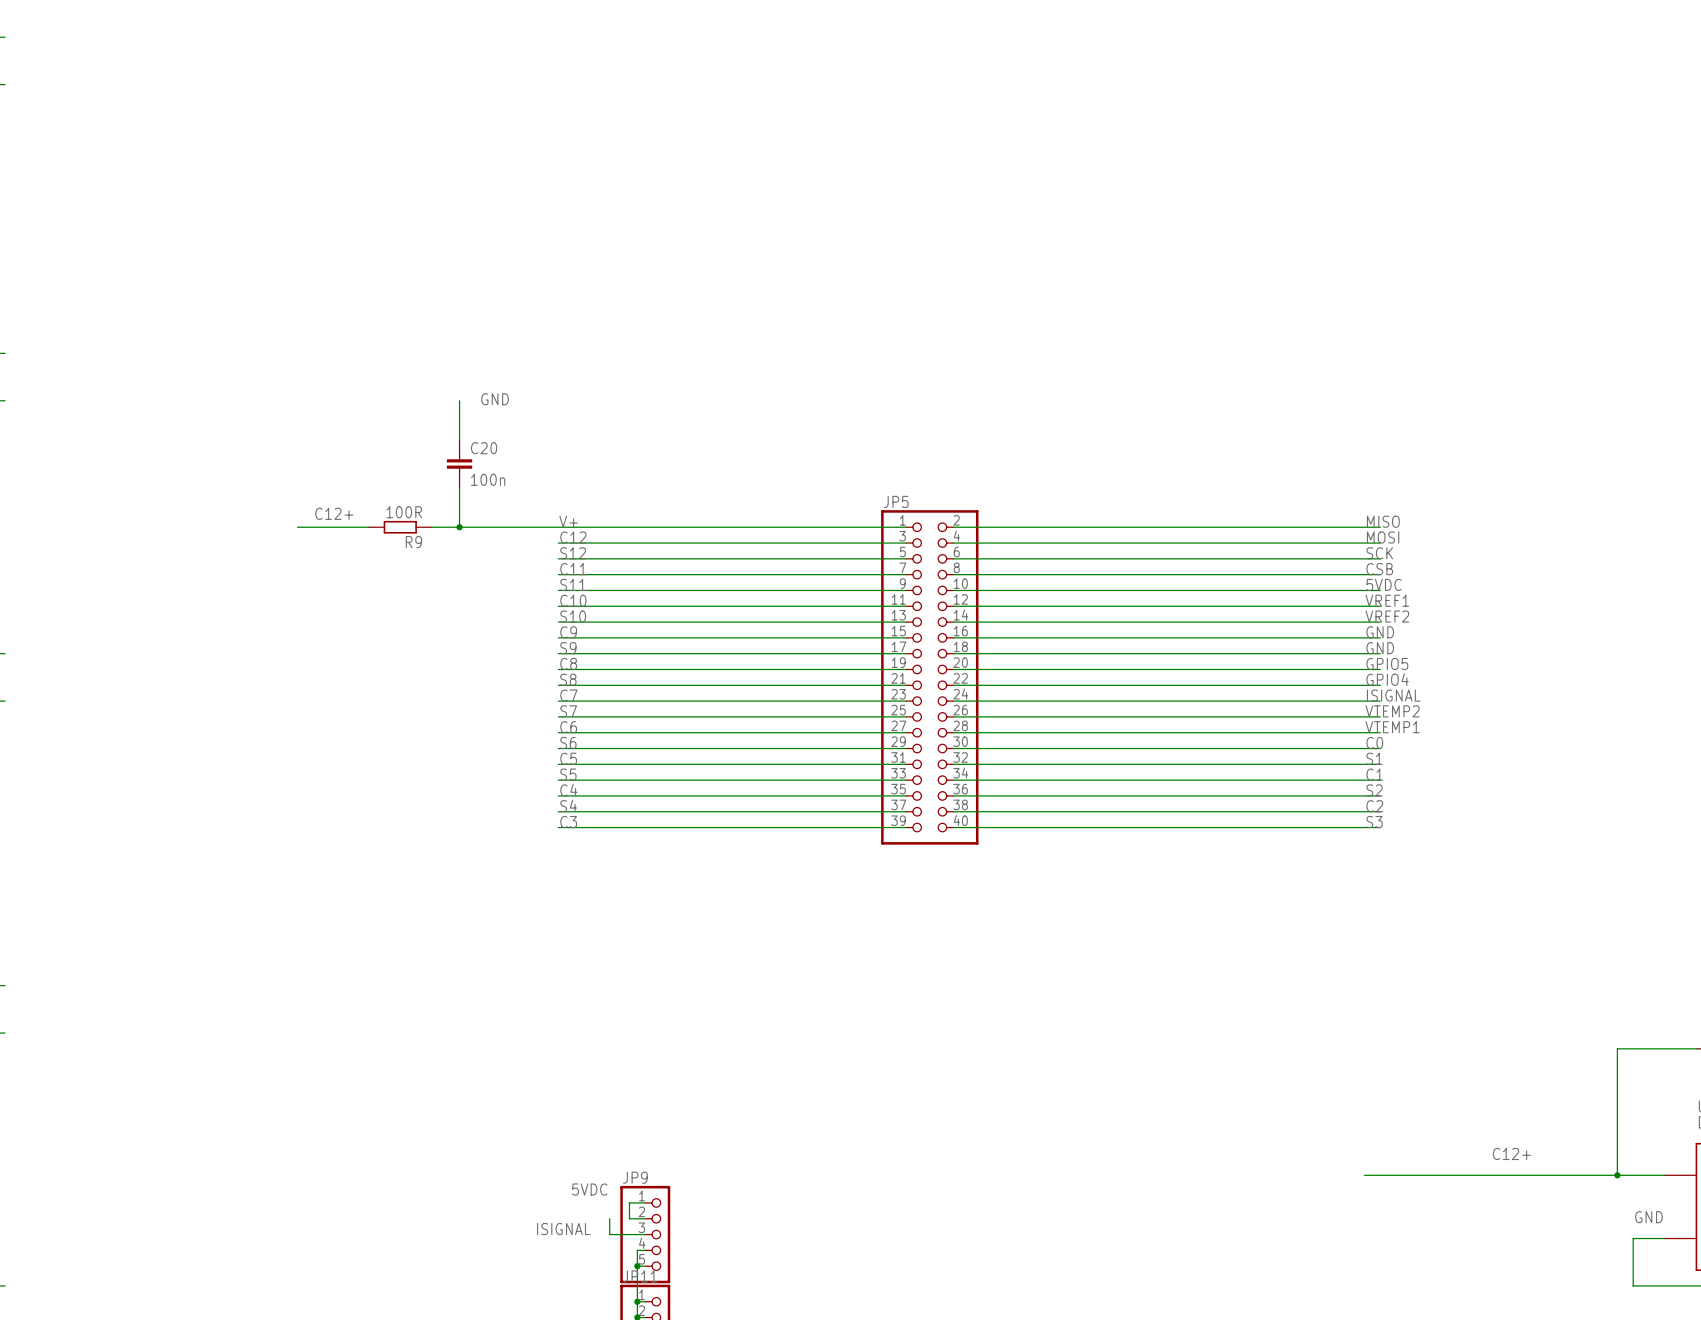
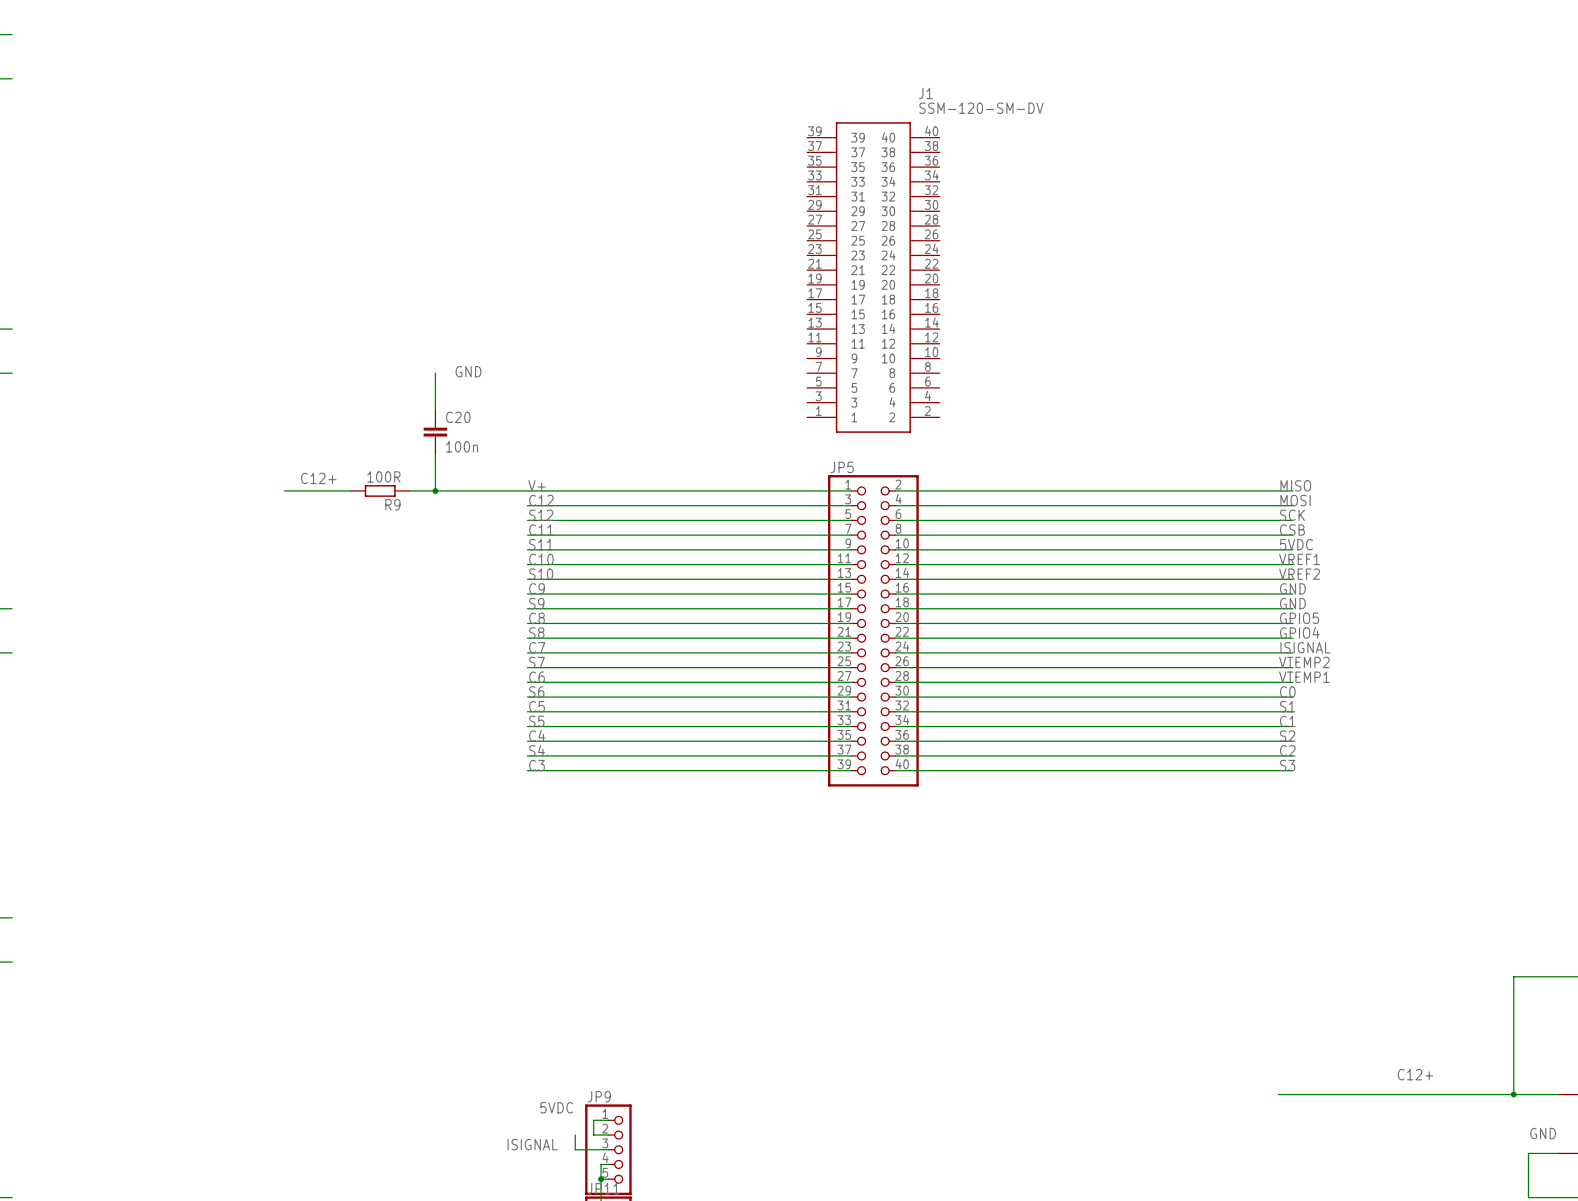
J1: none -> SSM-120-SM-DV (873, 277)

